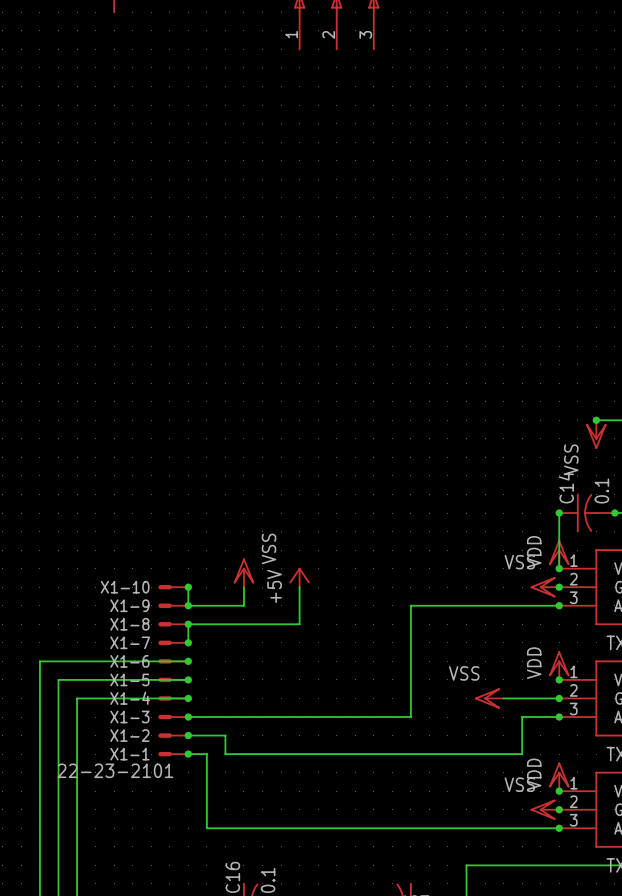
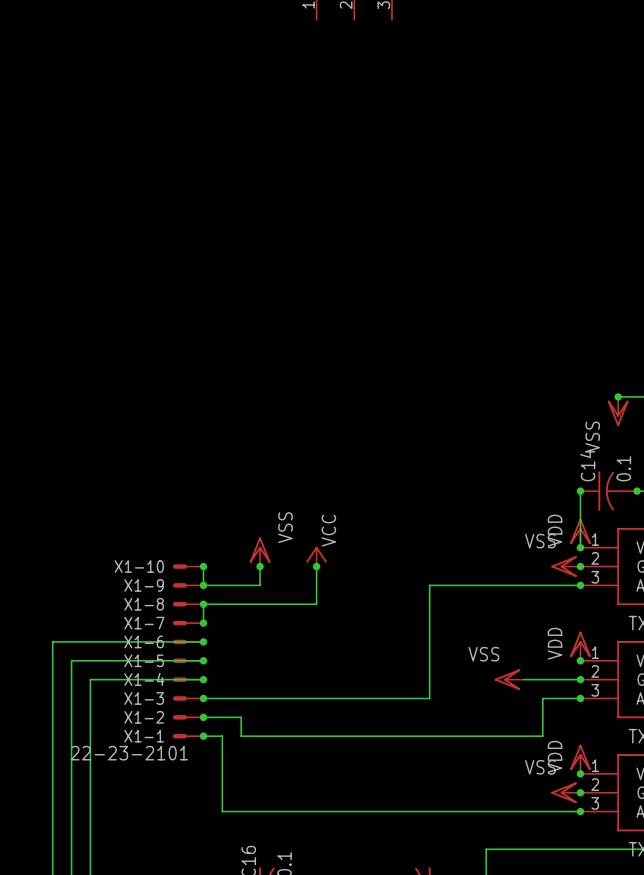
power symbol: +5V (299, 577) -> VCC (316, 556)
junction: none -> (260, 566)
junction: none -> (316, 566)

